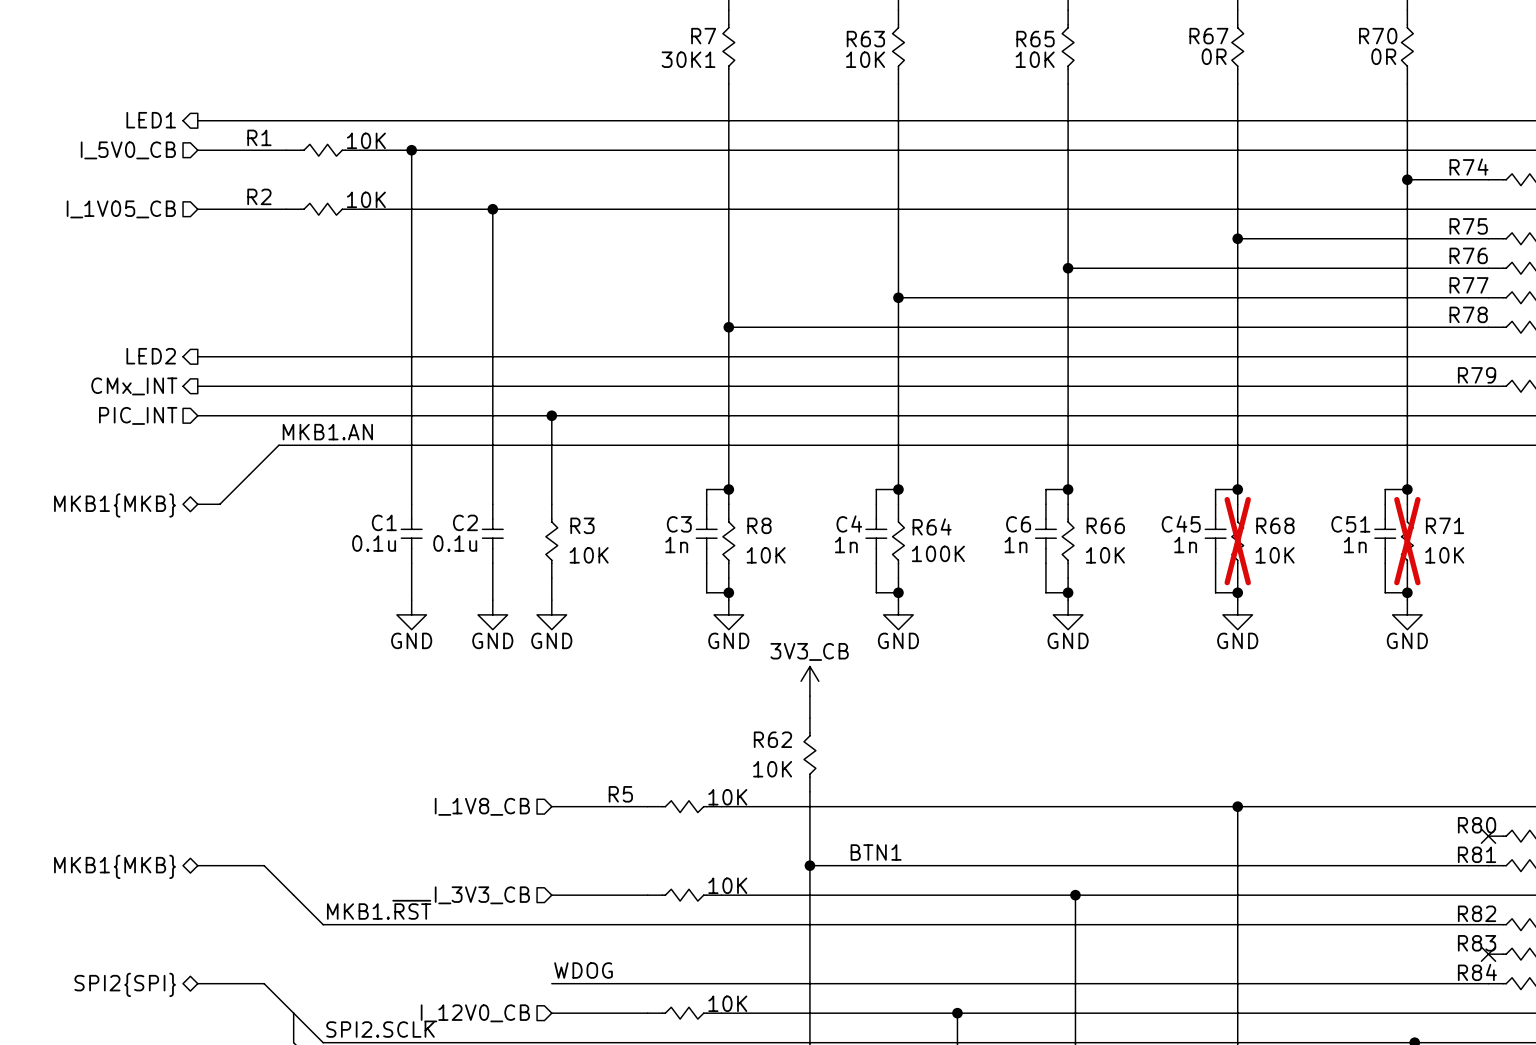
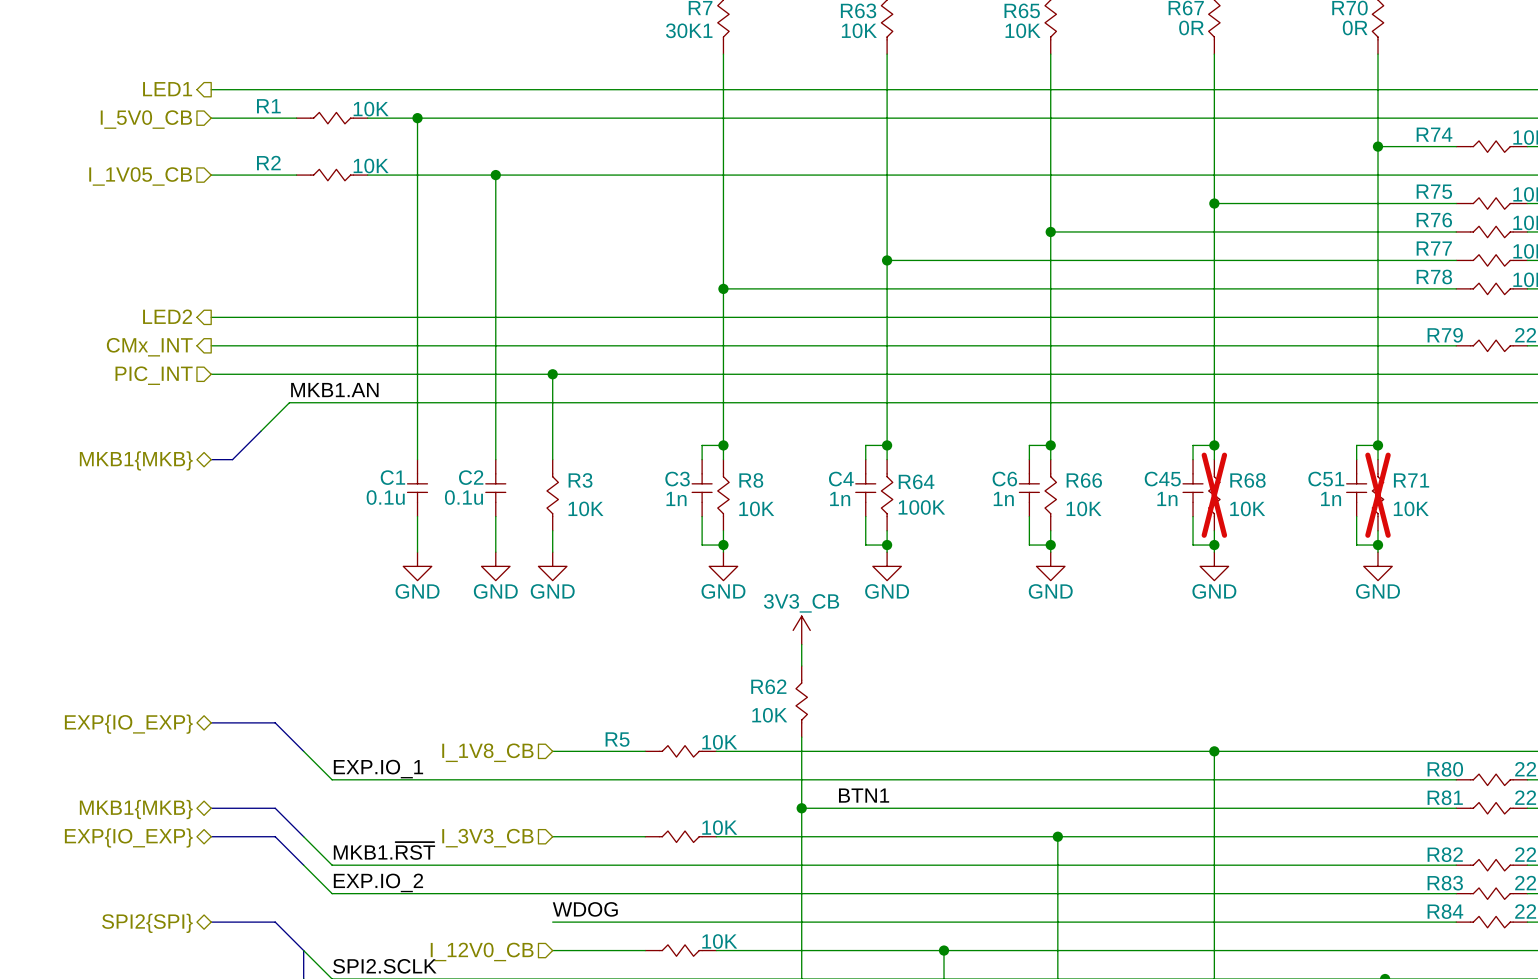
bus: none -> (211, 722) (275, 722) (303, 751)
hierarchical label: none -> EXP{IO_EXP} (128, 724)
wire: none -> (303, 751) (332, 779) (1456, 779)
label: none -> EXP.IO_1 (378, 769)
no-connect mark: (1488, 836) -> none
bus: none -> (211, 836) (275, 836) (303, 865)
hierarchical label: none -> EXP{IO_EXP} (128, 837)
wire: none -> (303, 865) (332, 893) (1456, 893)
label: none -> EXP.IO_2 (378, 882)
no-connect mark: (1488, 954) -> none

